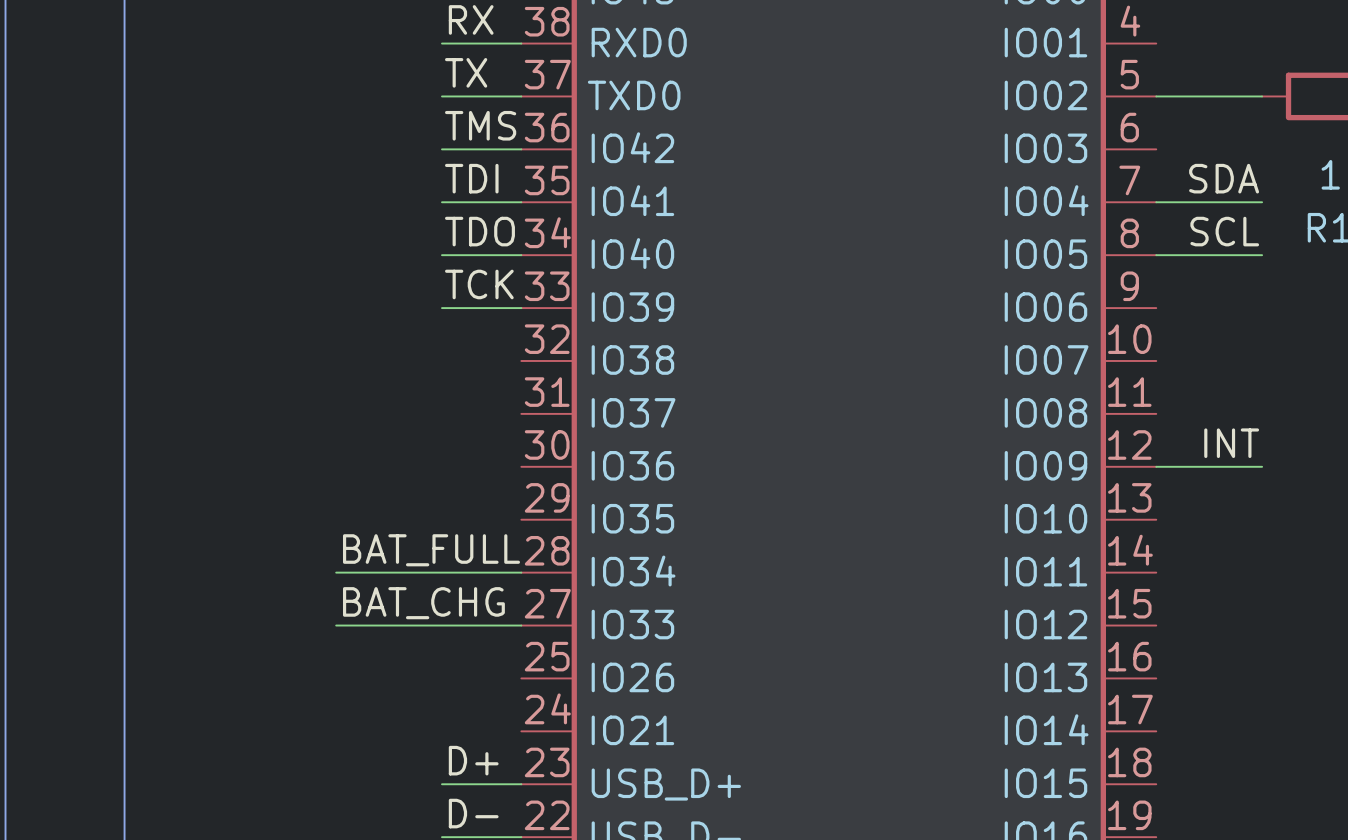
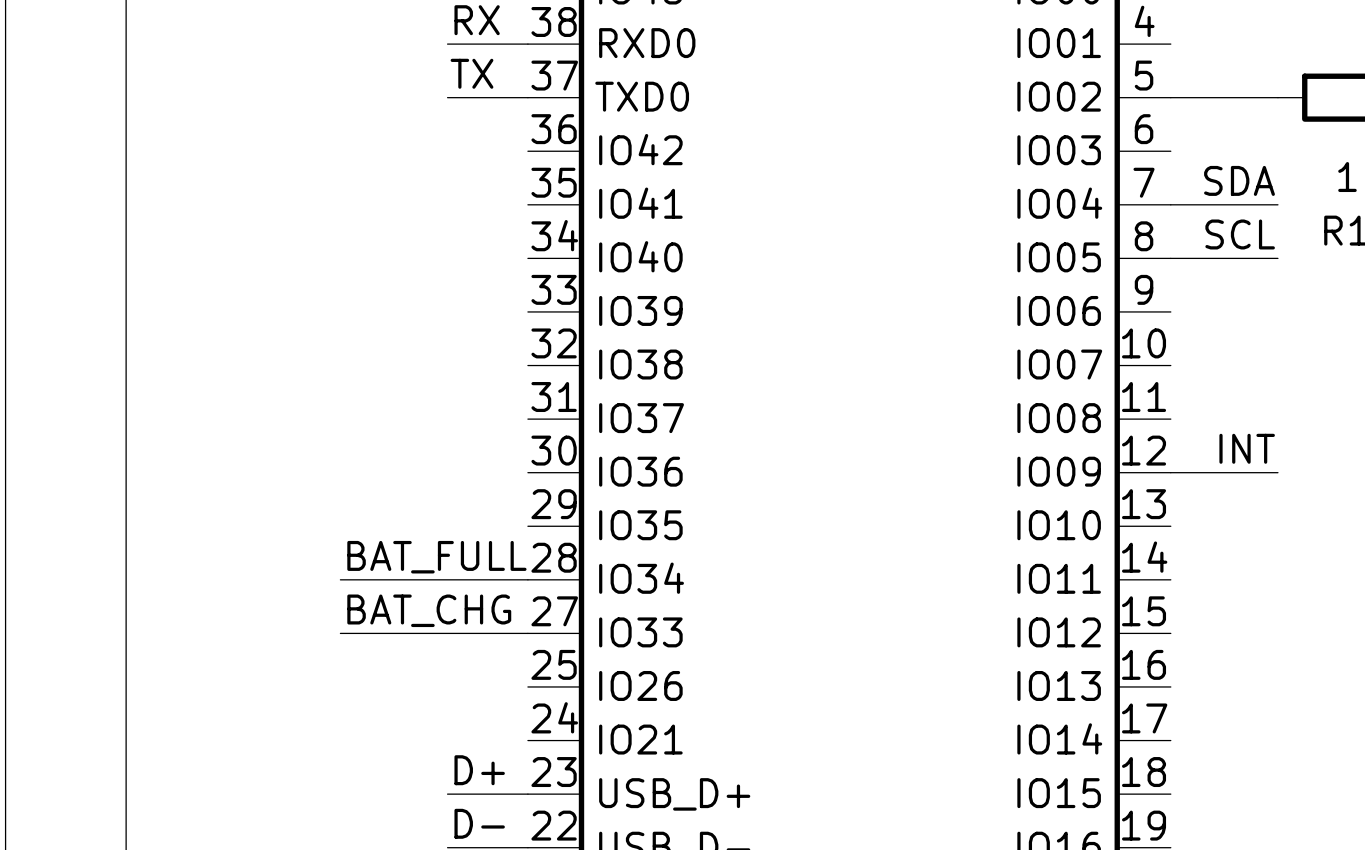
label: TMS (480, 125) -> none
wire: (442, 149) (521, 149) -> none
label: TDI (471, 178) -> none
wire: (442, 202) (521, 202) -> none
label: TDO (479, 231) -> none
wire: (442, 255) (521, 255) -> none
label: TCK (479, 284) -> none
wire: (442, 308) (521, 308) -> none

